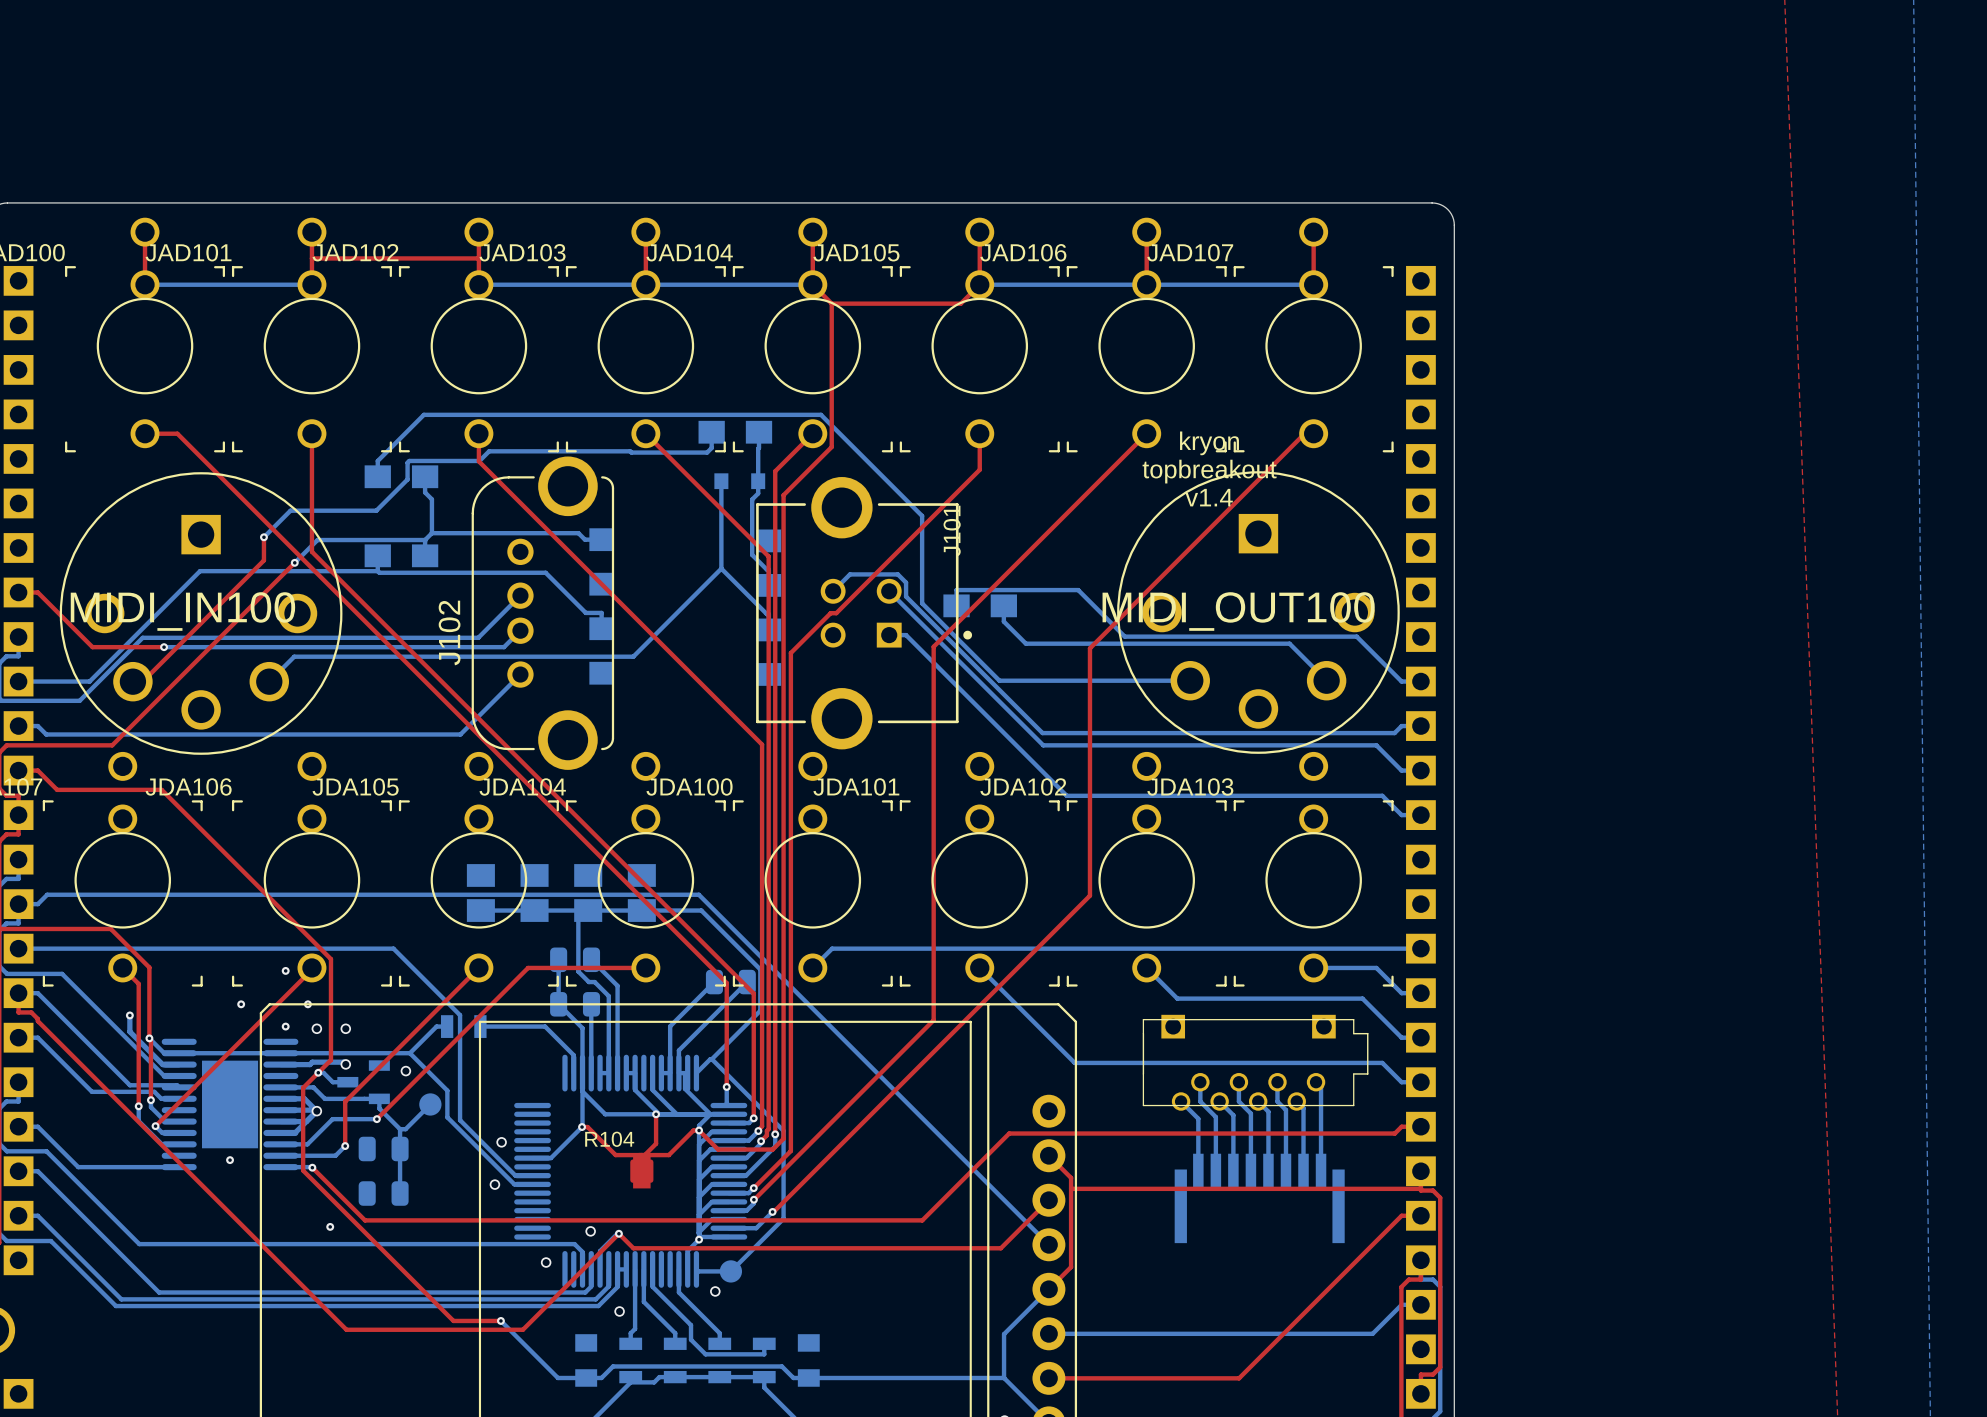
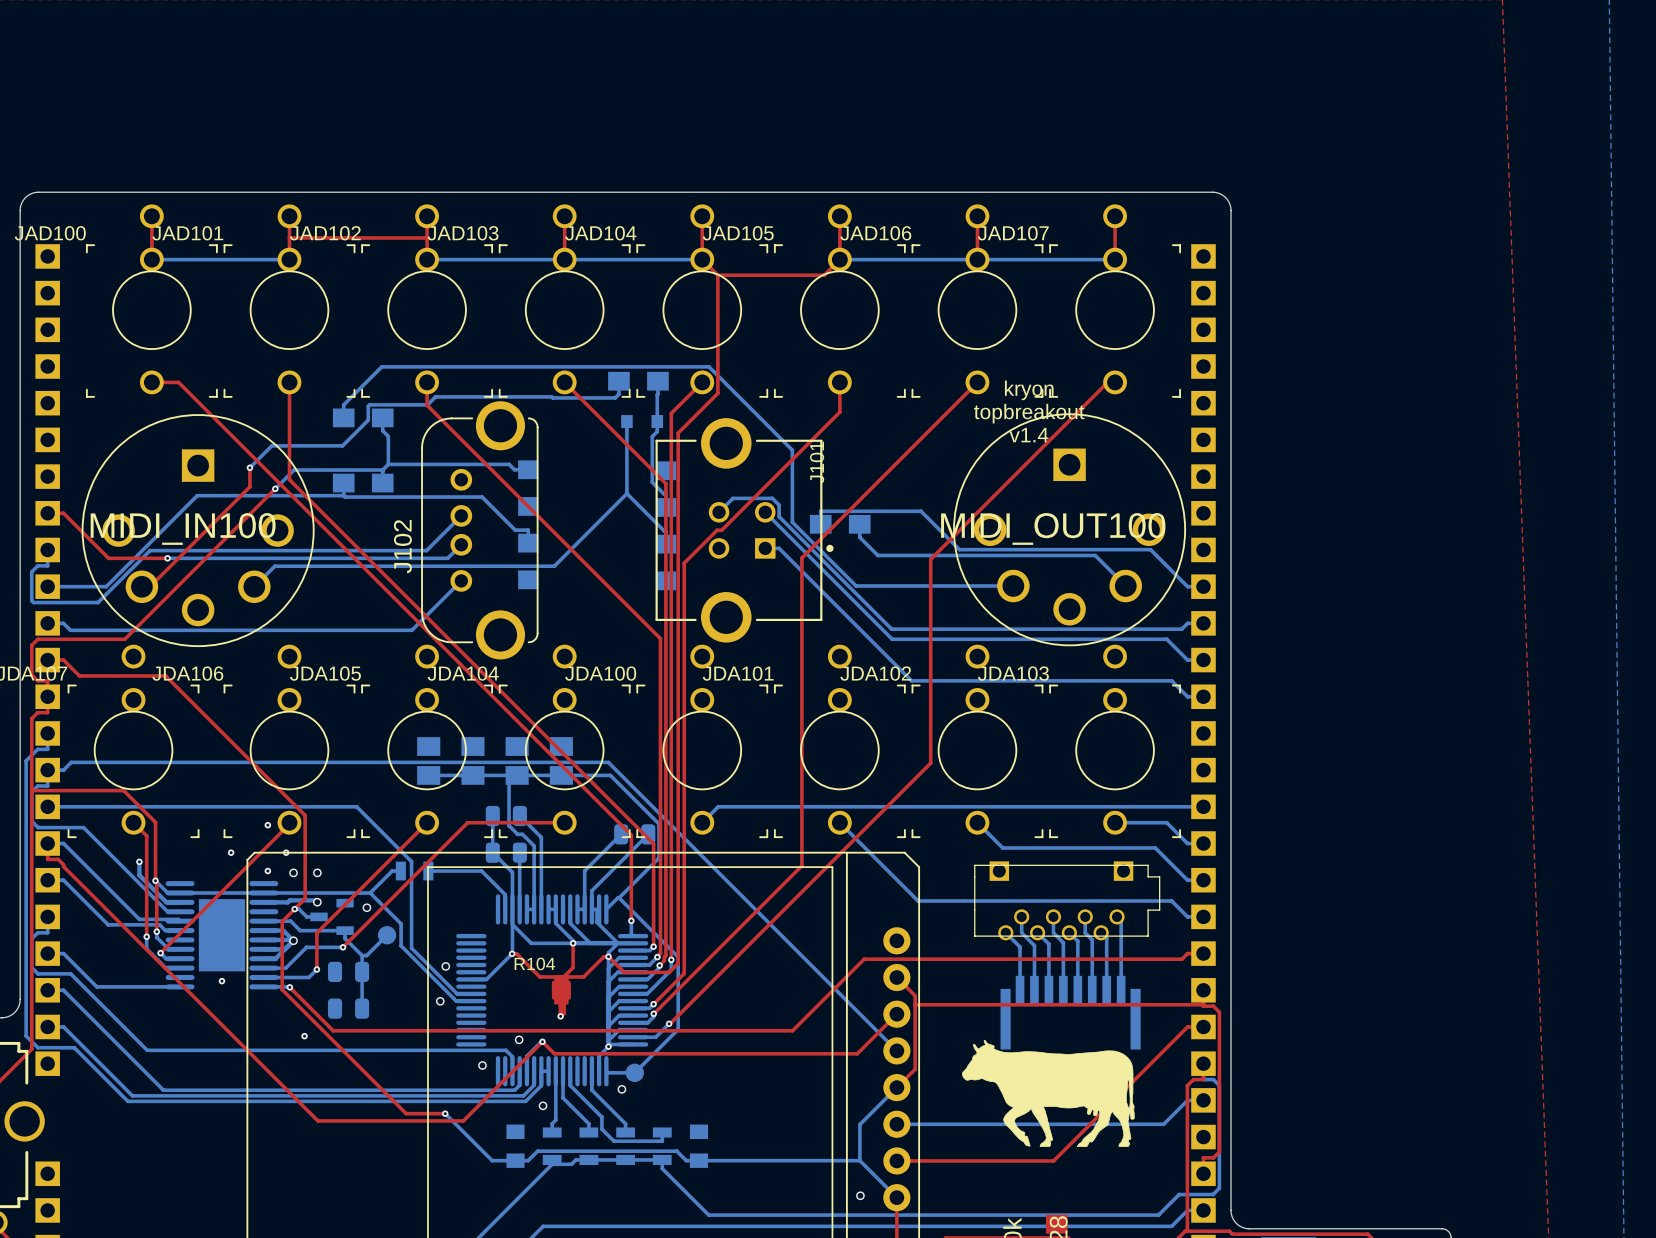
top track: none -> (562, 1003) (560, 1005) (560, 1016) (563, 1013) (563, 1003)
via: none -> (560, 1016)
drawing: none -> [962, 1039, 1135, 1147]

